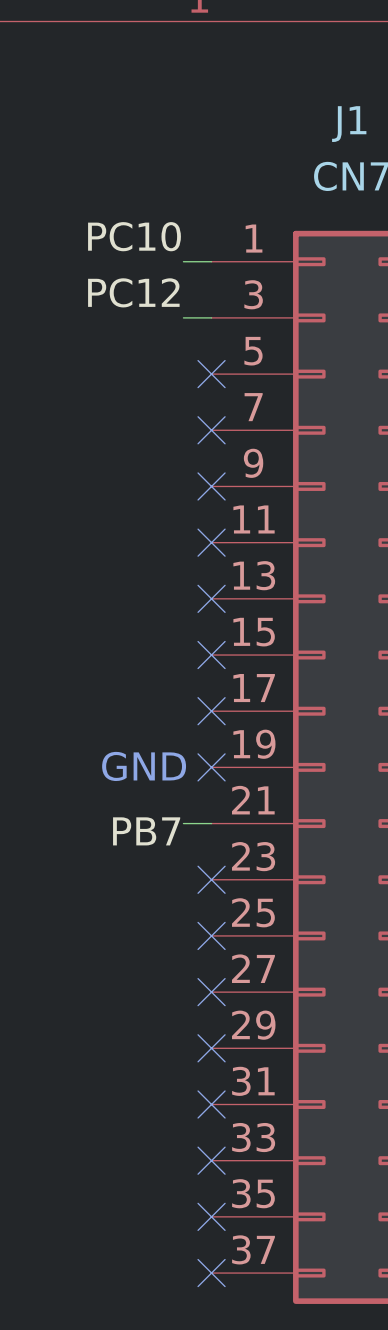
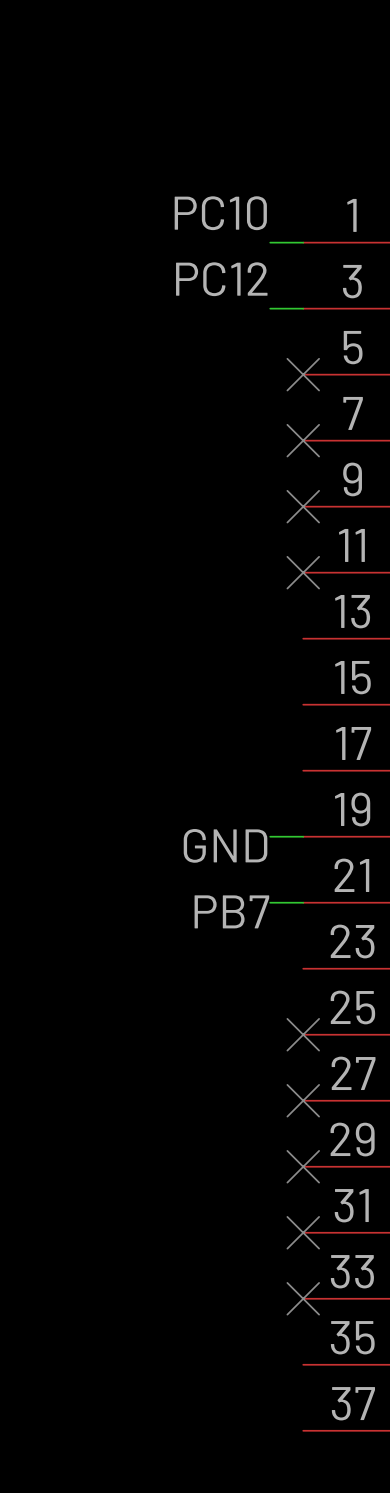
no-connect mark: (211, 598) -> none
no-connect mark: (211, 655) -> none
no-connect mark: (211, 711) -> none
text: GND (144, 766) -> none
wire: none -> (270, 836) (303, 836)
no-connect mark: (211, 767) -> none
label: none -> GND (225, 845)
no-connect mark: (211, 879) -> none
no-connect mark: (211, 1216) -> none
no-connect mark: (211, 1273) -> none

